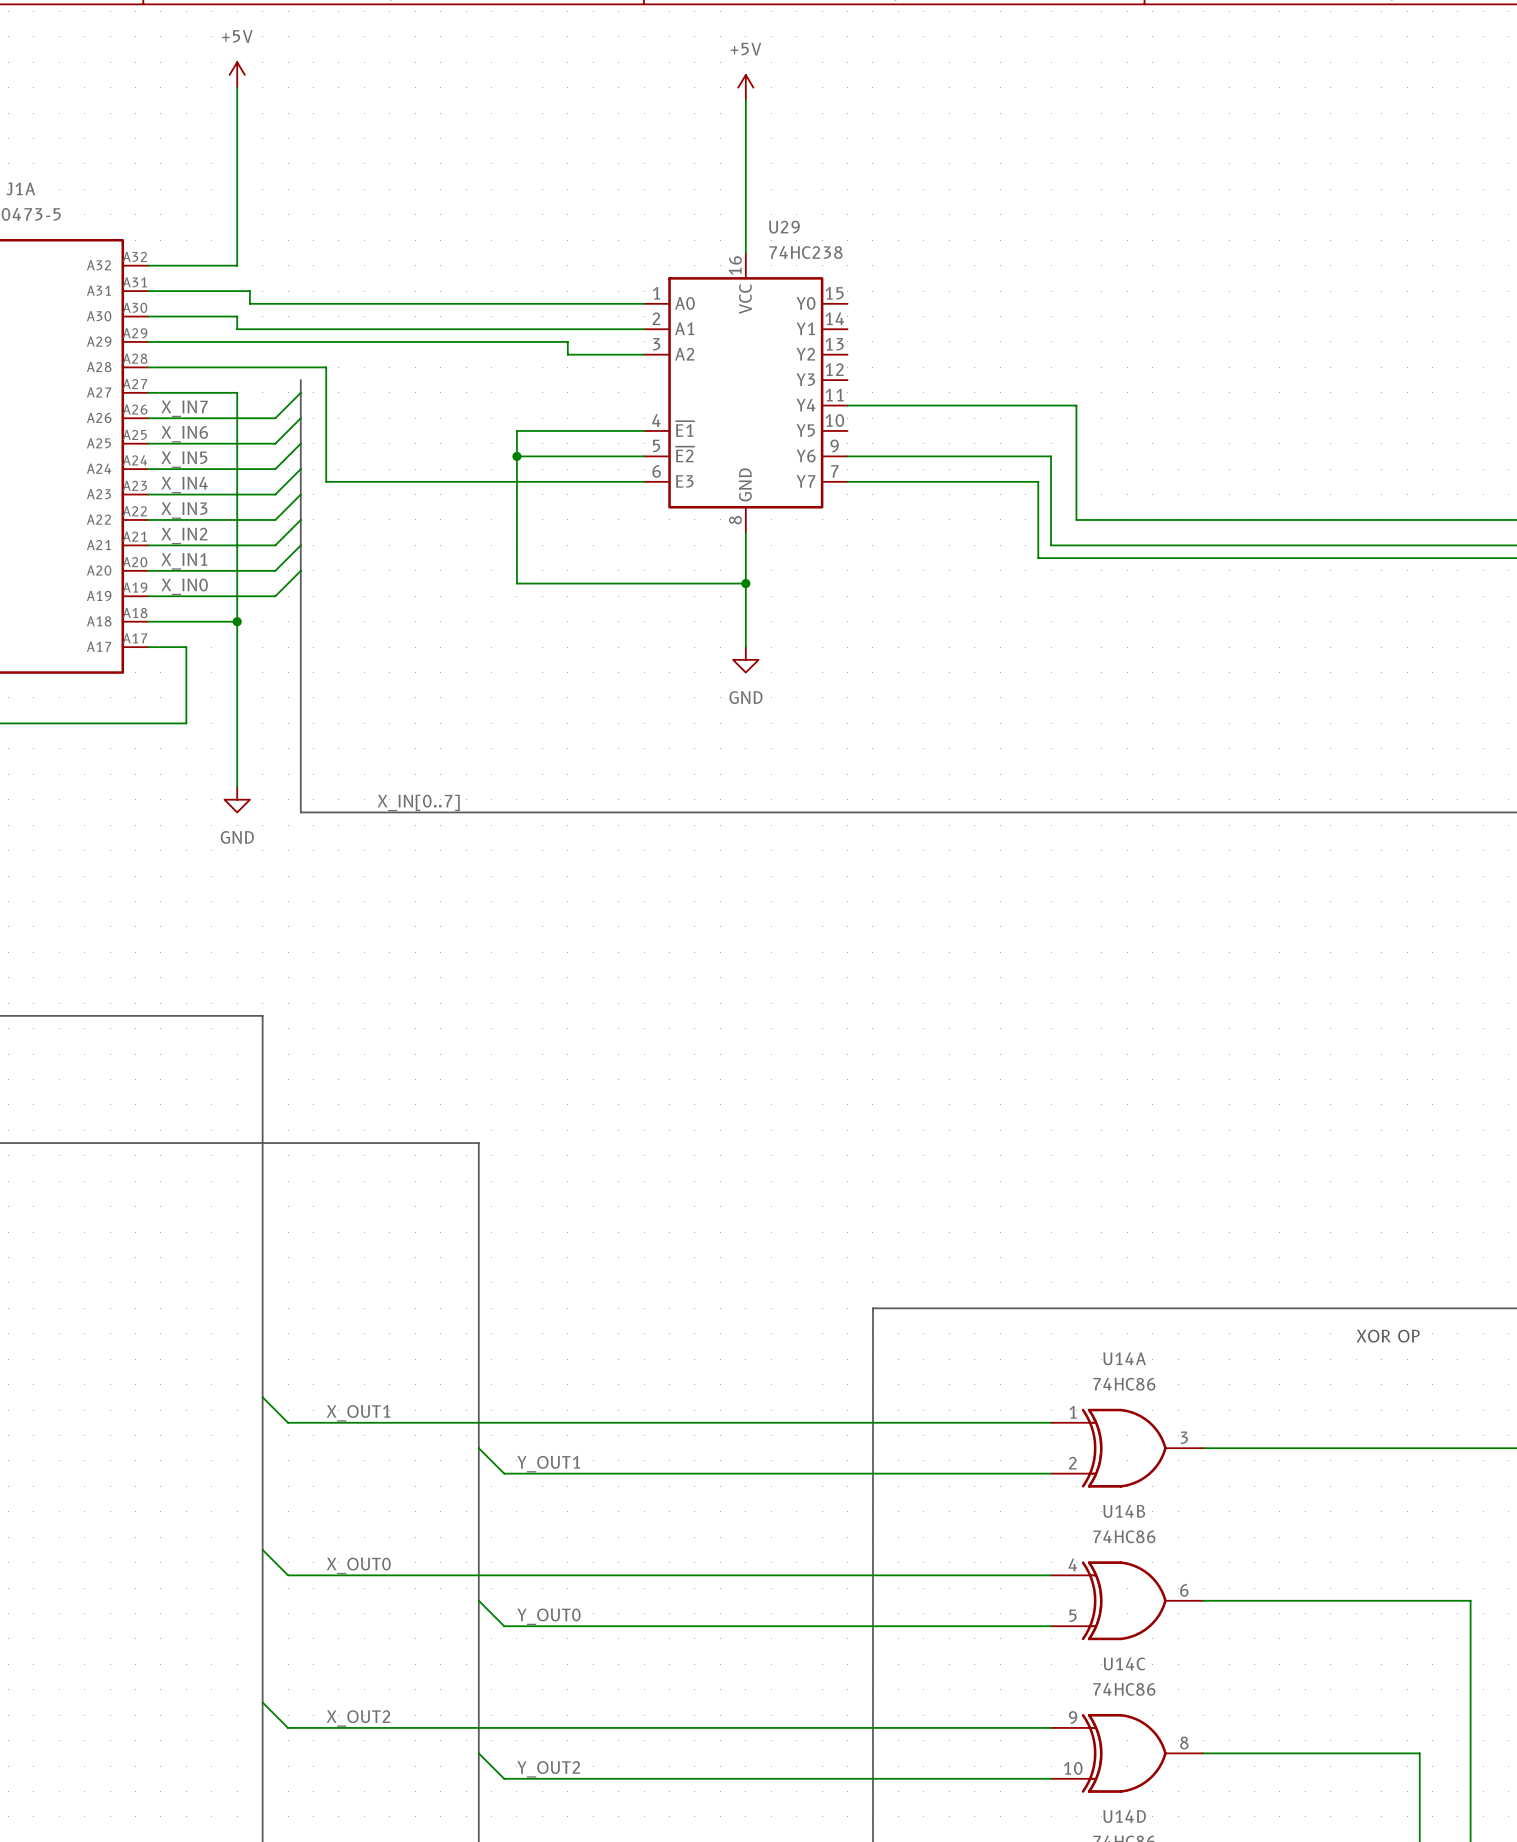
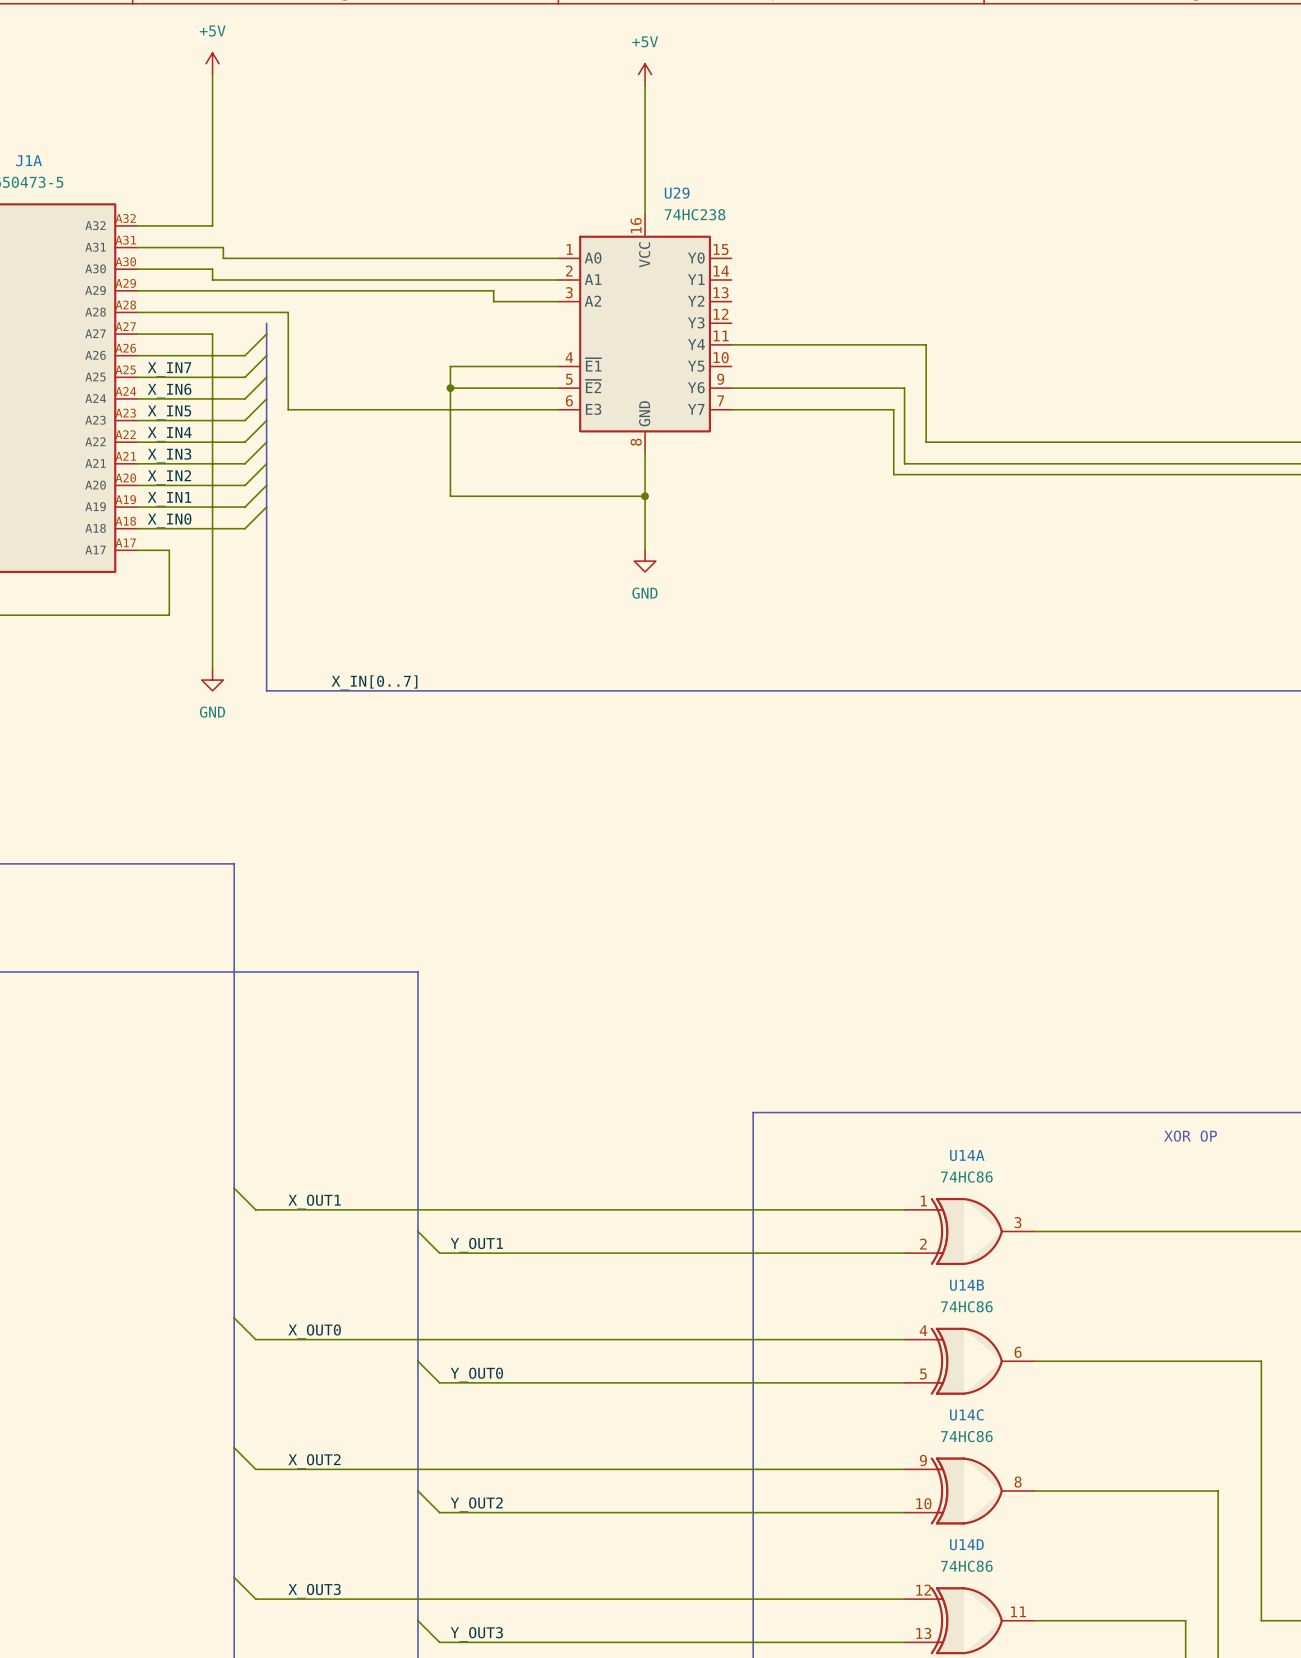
label: X_IN7 (184, 408) -> none
label: X_IN6 (184, 434) -> X_IN7 (169, 369)
label: X_IN5 (184, 459) -> X_IN6 (169, 390)
label: X_IN4 (184, 485) -> X_IN5 (169, 412)
label: X_IN3 (184, 510) -> X_IN4 (169, 434)
label: X_IN2 (184, 535) -> X_IN3 (169, 455)
label: X_IN1 (184, 561) -> X_IN2 (169, 477)
label: X_IN0 (184, 586) -> X_IN1 (169, 499)
wire: none -> (266, 507) (244, 528) (212, 528)
label: none -> X_IN0 (169, 520)
junction: (237, 621) -> none

